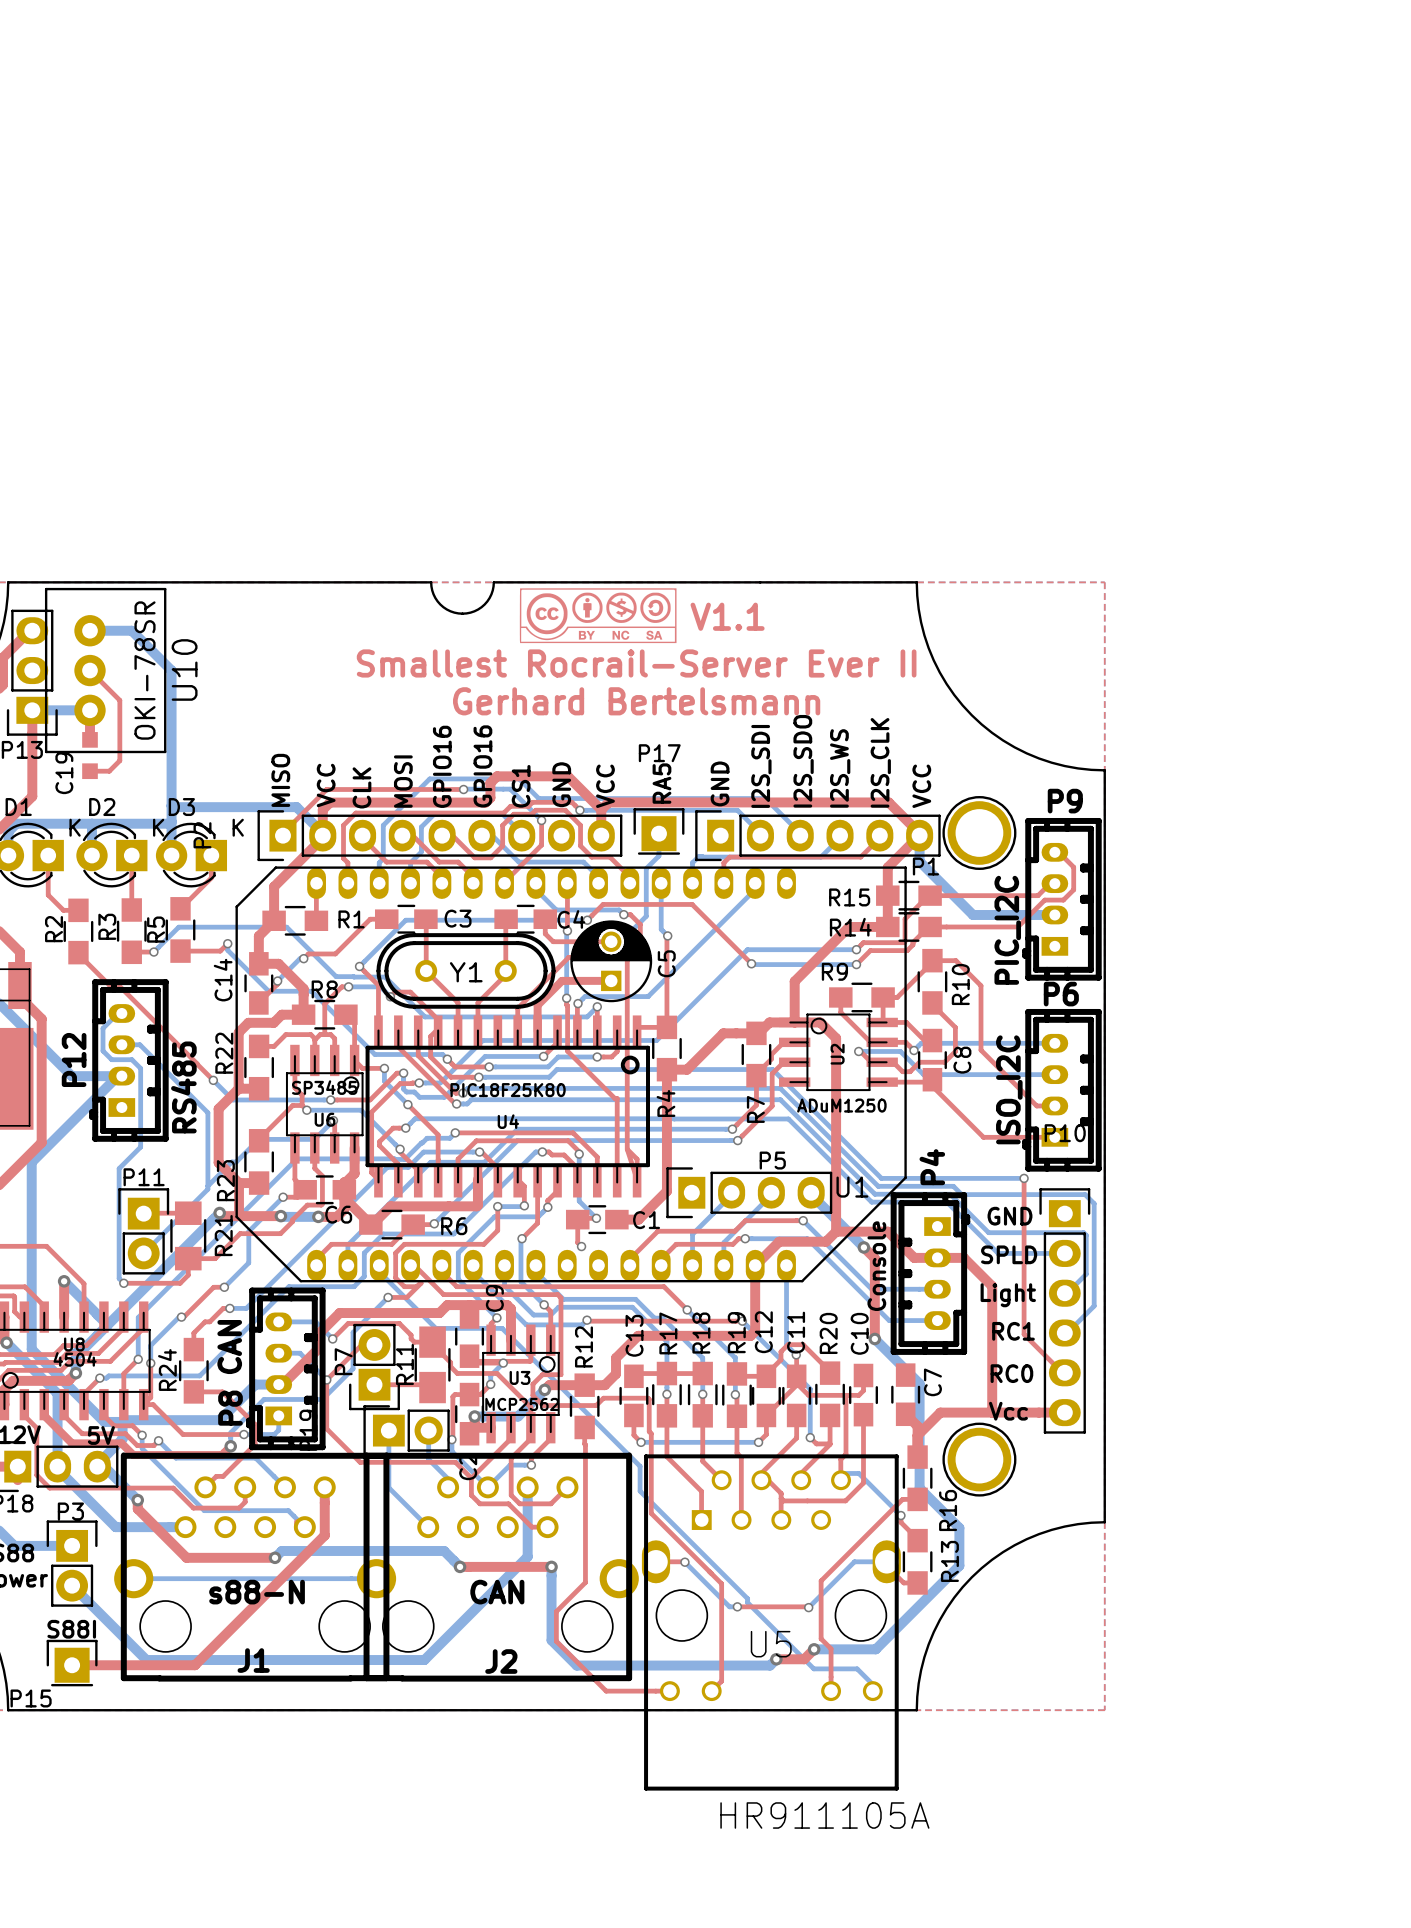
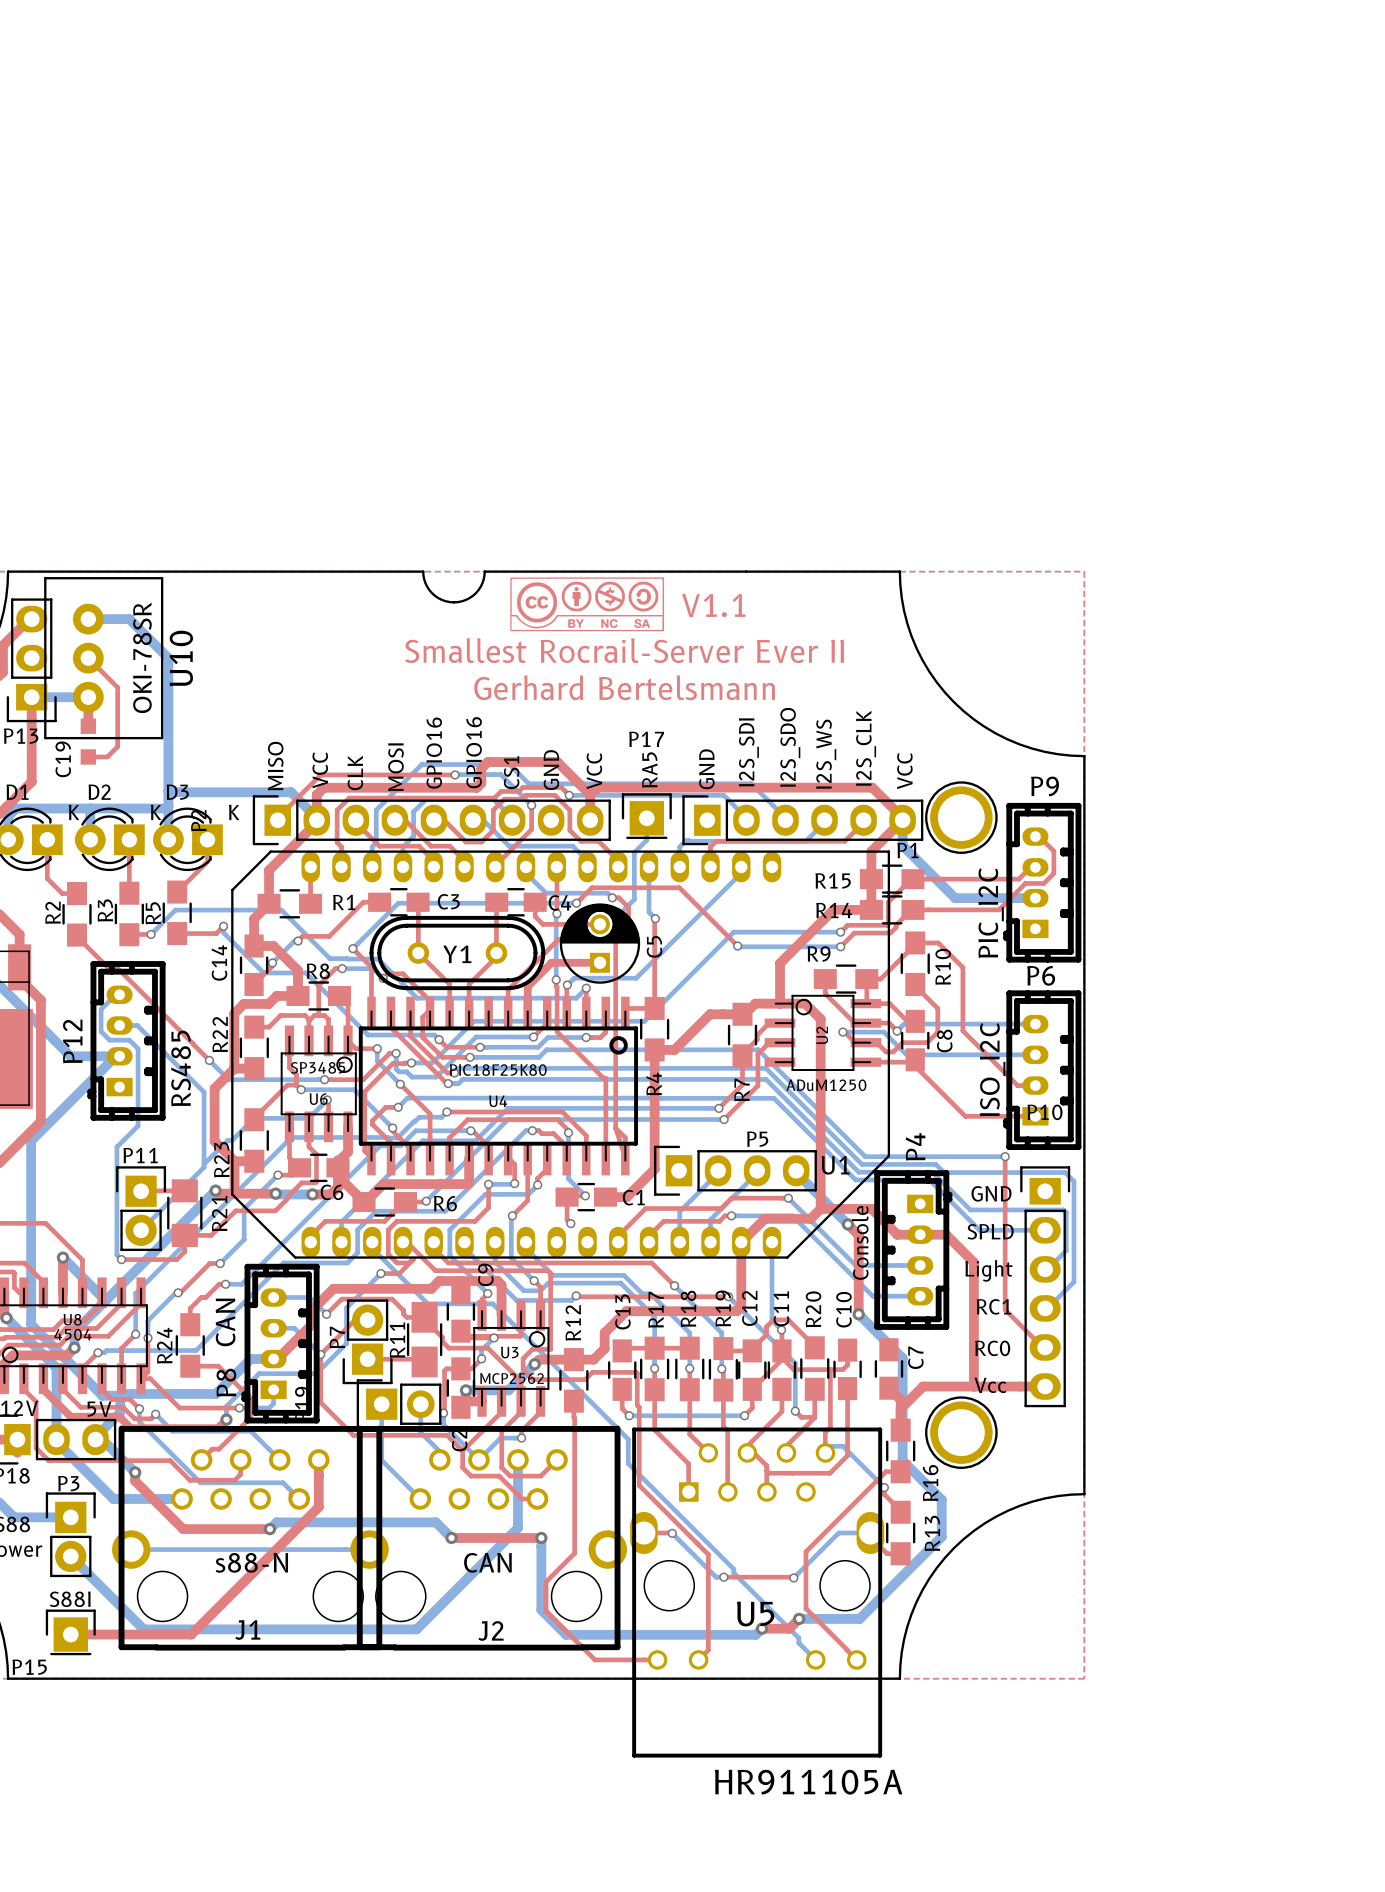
top track: (831, 1648) (831, 1691) -> (815, 1618) (856, 1659)
bottom track: (813, 1668) (857, 1668) (872, 1684) -> (798, 1638) (798, 1643) (815, 1659)

